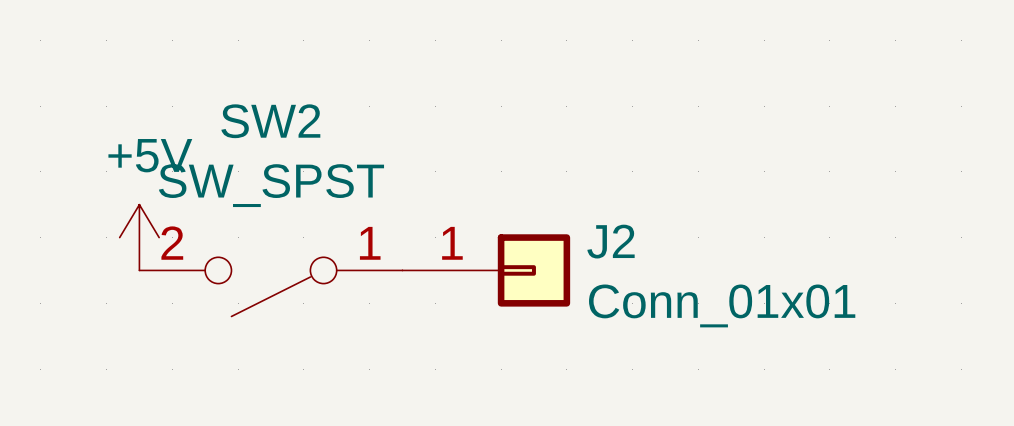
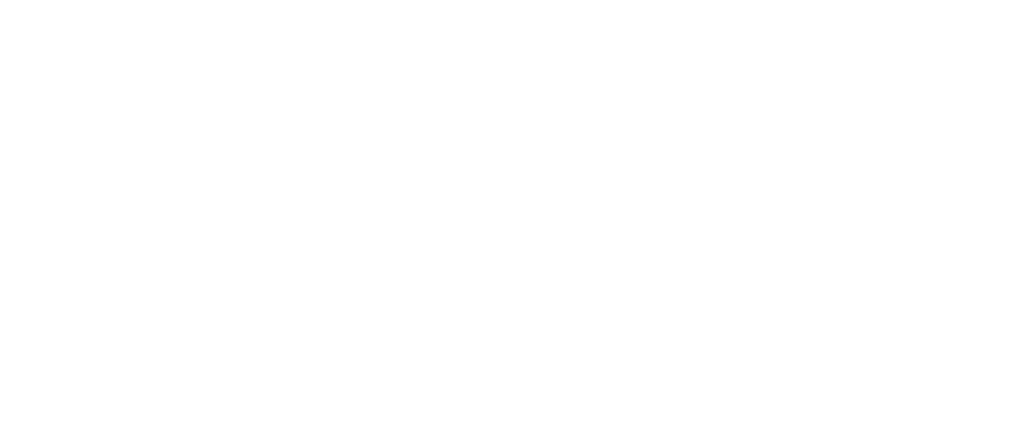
power symbol: +5V (139, 237) -> none
J2: Conn_01x01 (486, 270) -> none
SW2: SW_SPST (270, 286) -> none

